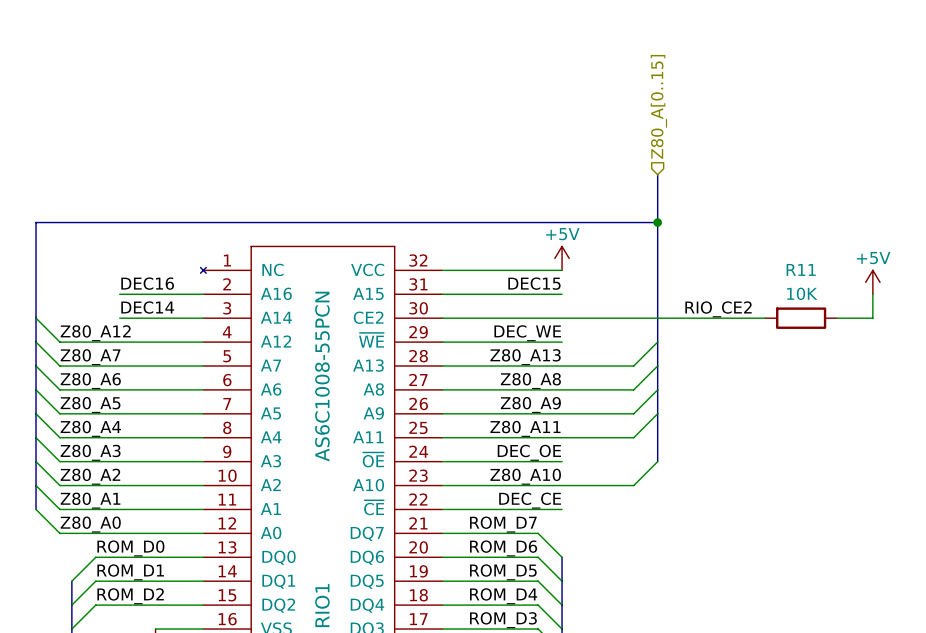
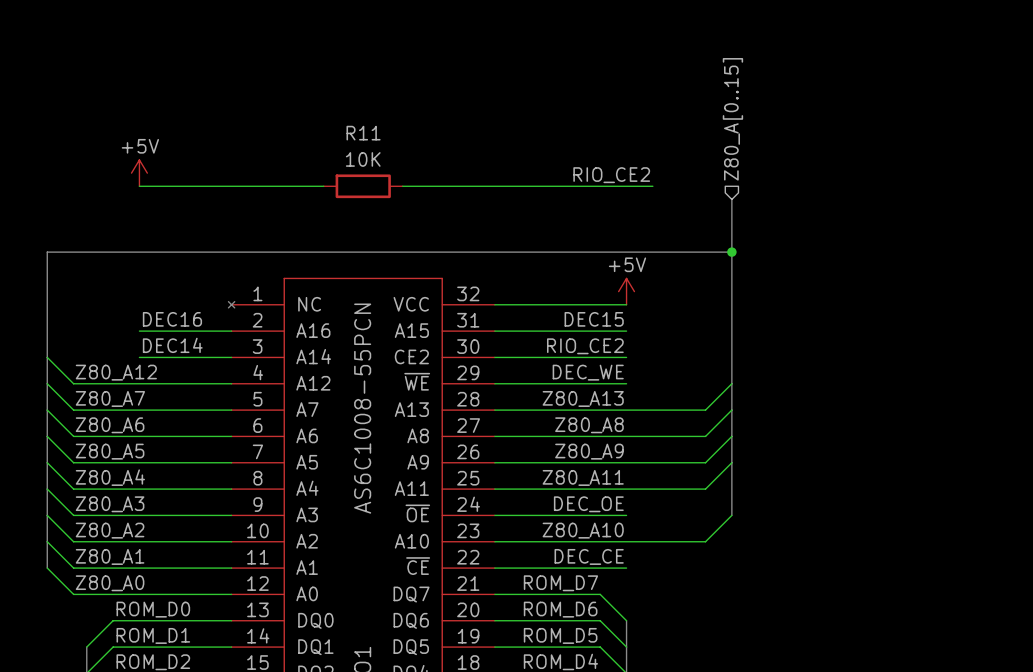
power symbol: none -> +5V (139, 173)
label: none -> RIO_CE2 (611, 175)
wire: none -> (139, 186) (323, 186)
wire: none -> (402, 186) (652, 186)
power symbol: +5V (872, 282) -> none
wire: (872, 294) (872, 318) (837, 318) -> none
label: none -> RIO_CE2 (585, 346)
label: RIO_CE2 (718, 309) -> none
wire: (562, 318) (765, 318) -> none
R11 position: (801, 318) -> (363, 186)

